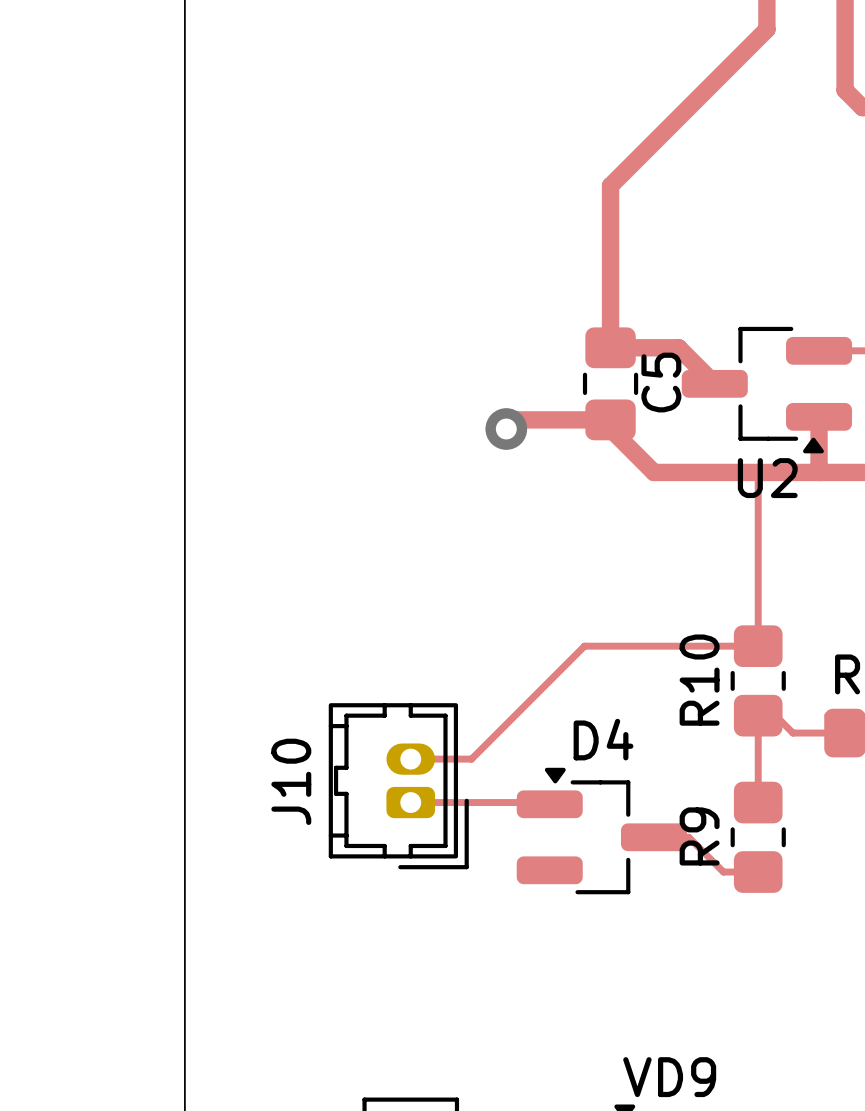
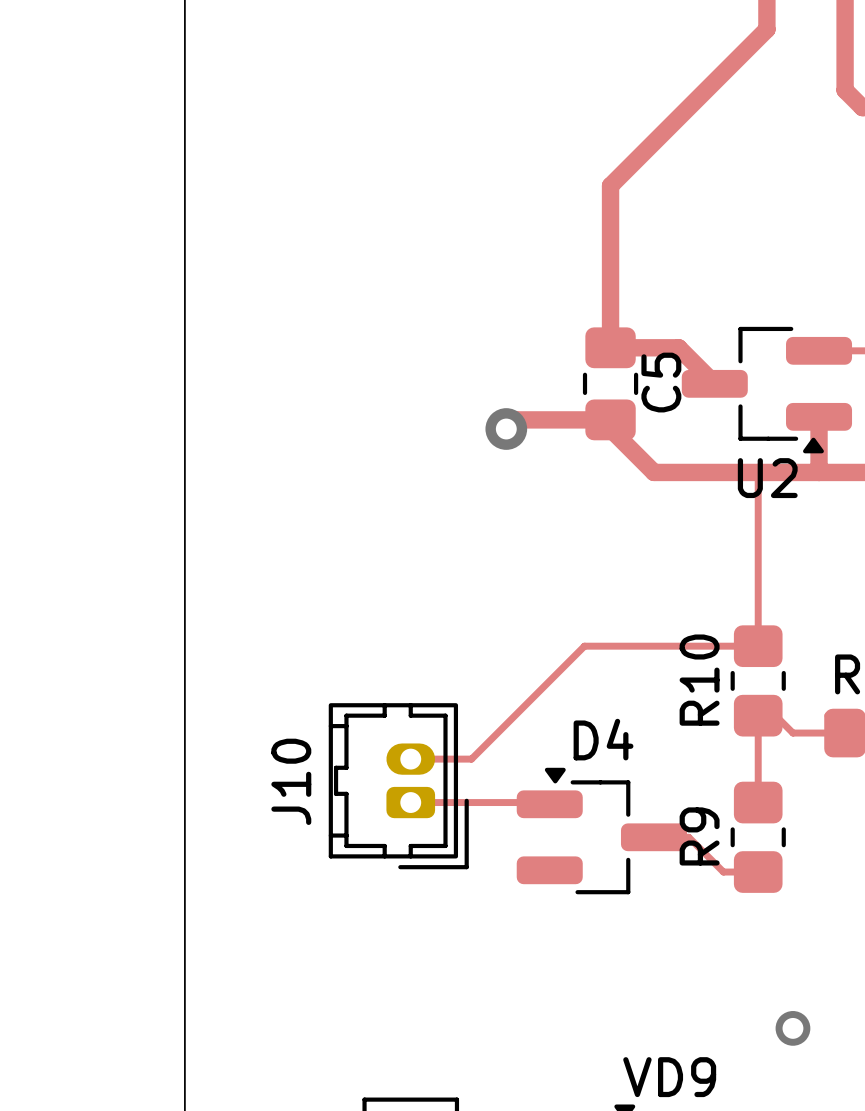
via: none -> (792, 1028)

